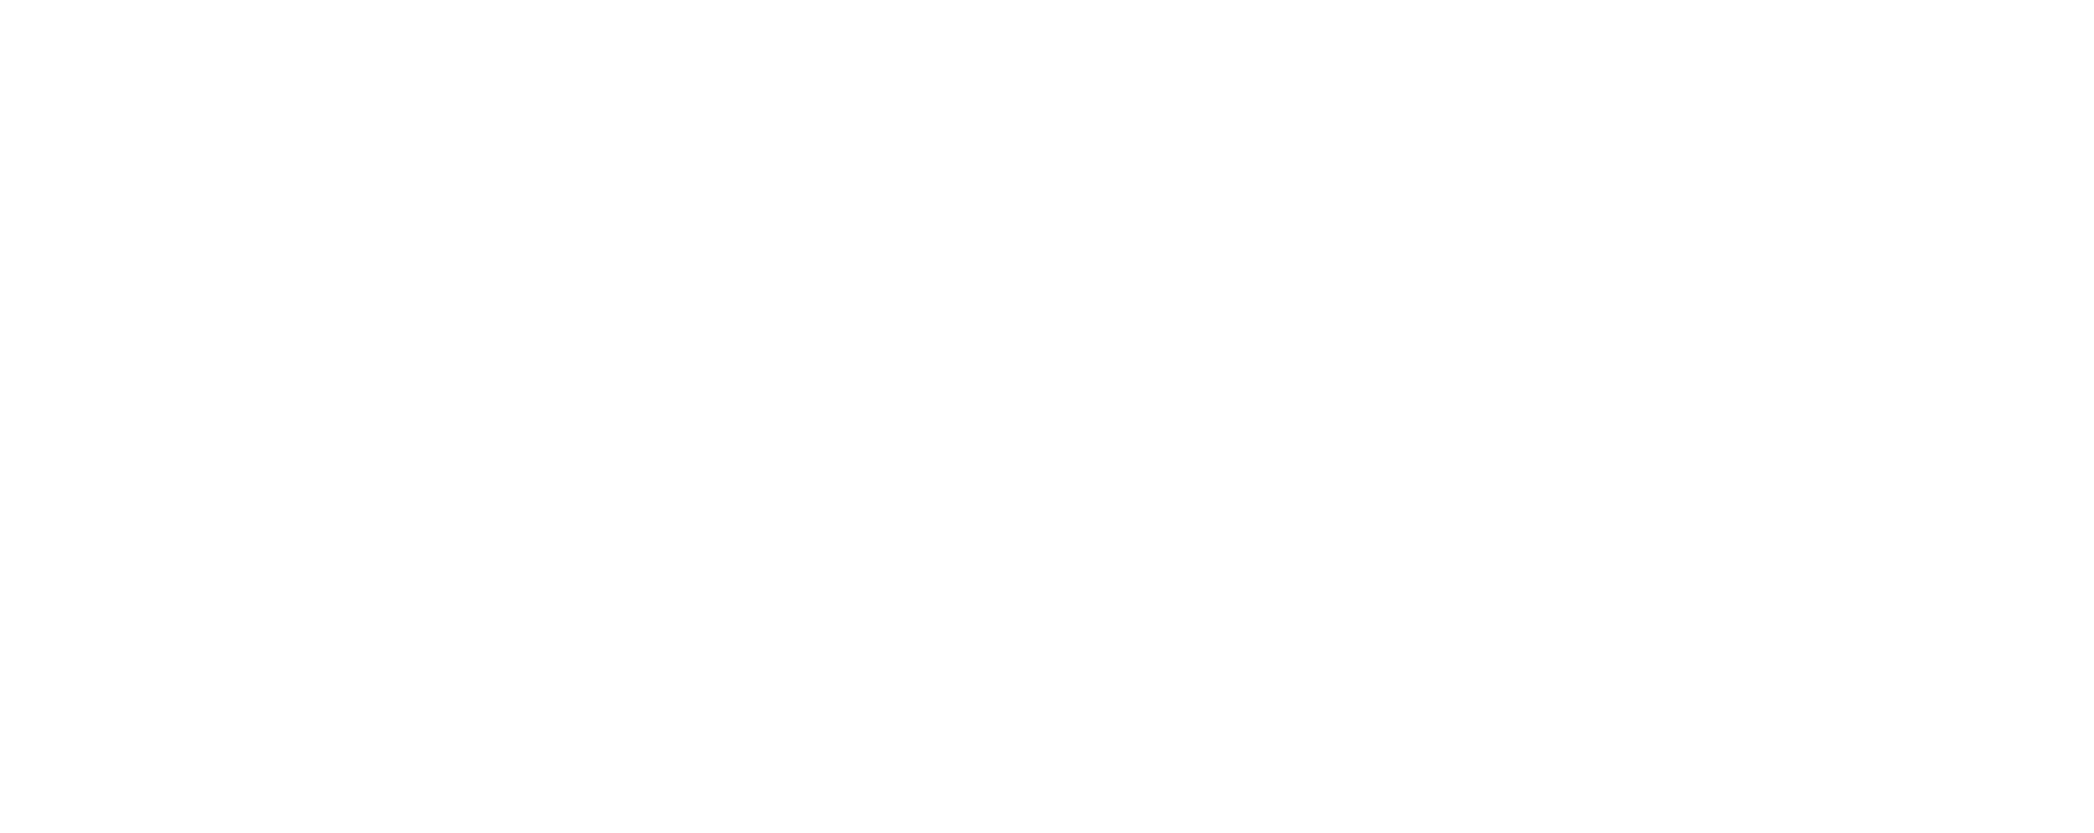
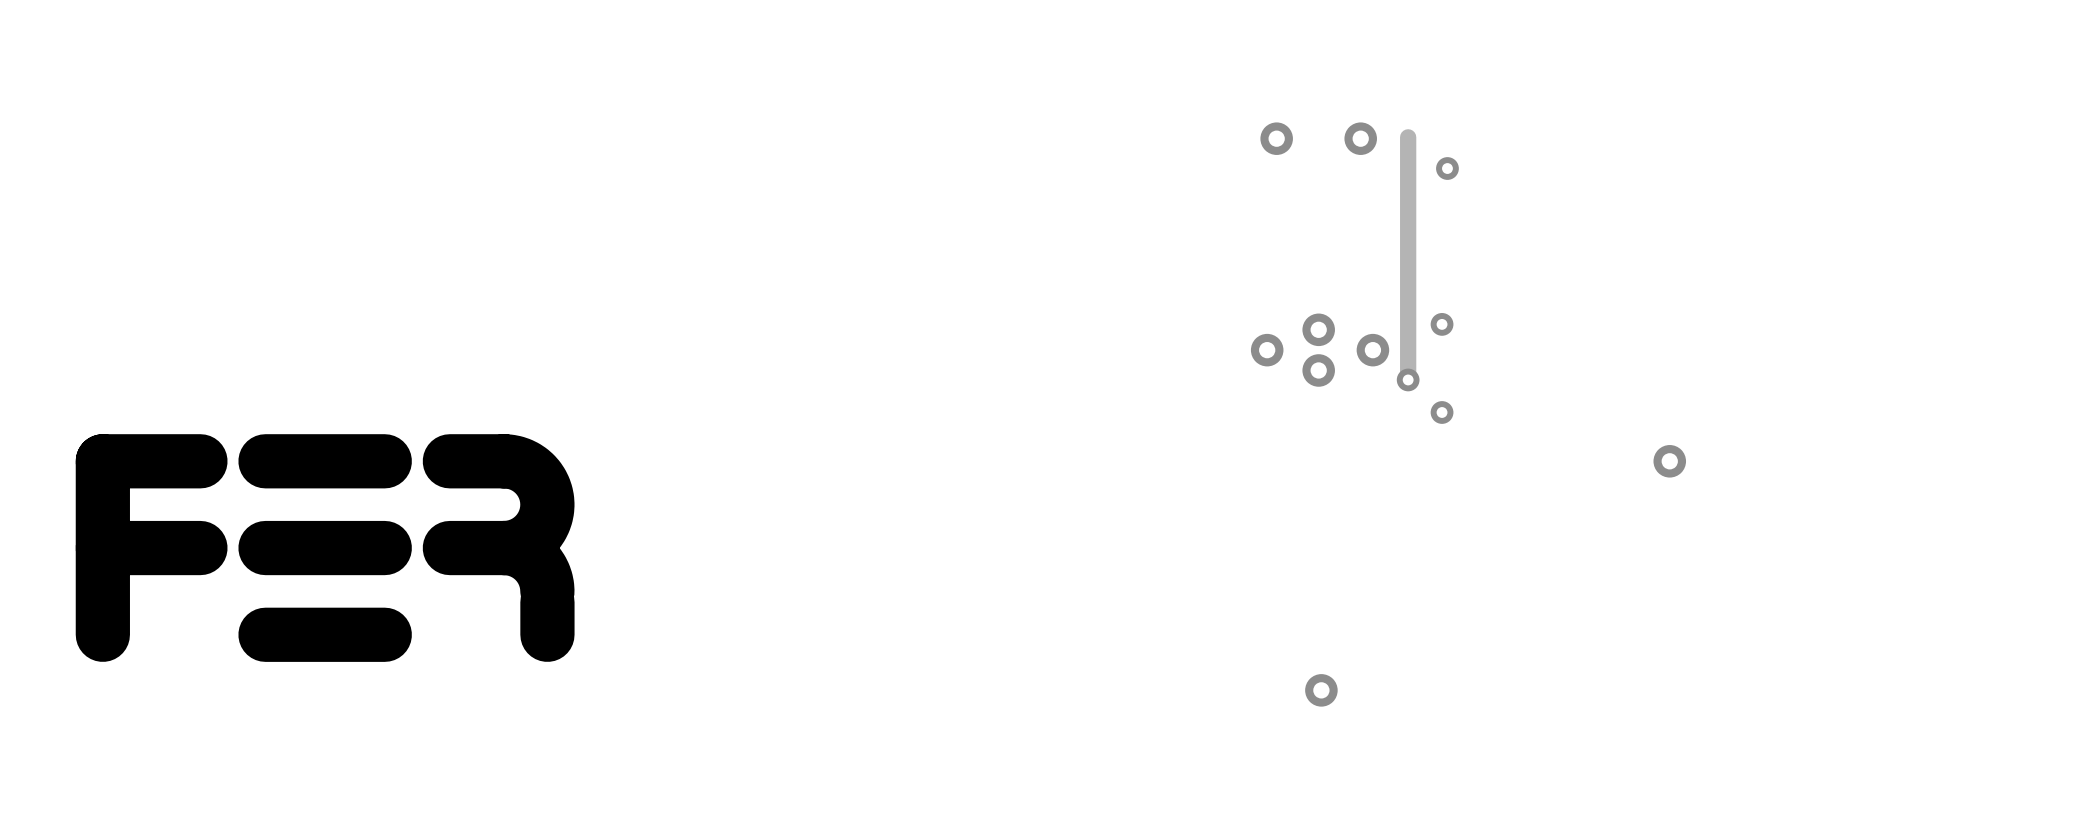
track: none -> (1408, 137) (1408, 379)
via: none -> (1276, 138)
via: none -> (1360, 138)
via: none -> (1447, 168)
via: none -> (1442, 324)
via: none -> (1318, 329)
via: none -> (1267, 350)
via: none -> (1372, 350)
via: none -> (1318, 370)
via: none -> (1408, 379)
via: none -> (1442, 412)
drawing: none -> [75, 434, 575, 662]
via: none -> (1669, 461)
via: none -> (1321, 690)

